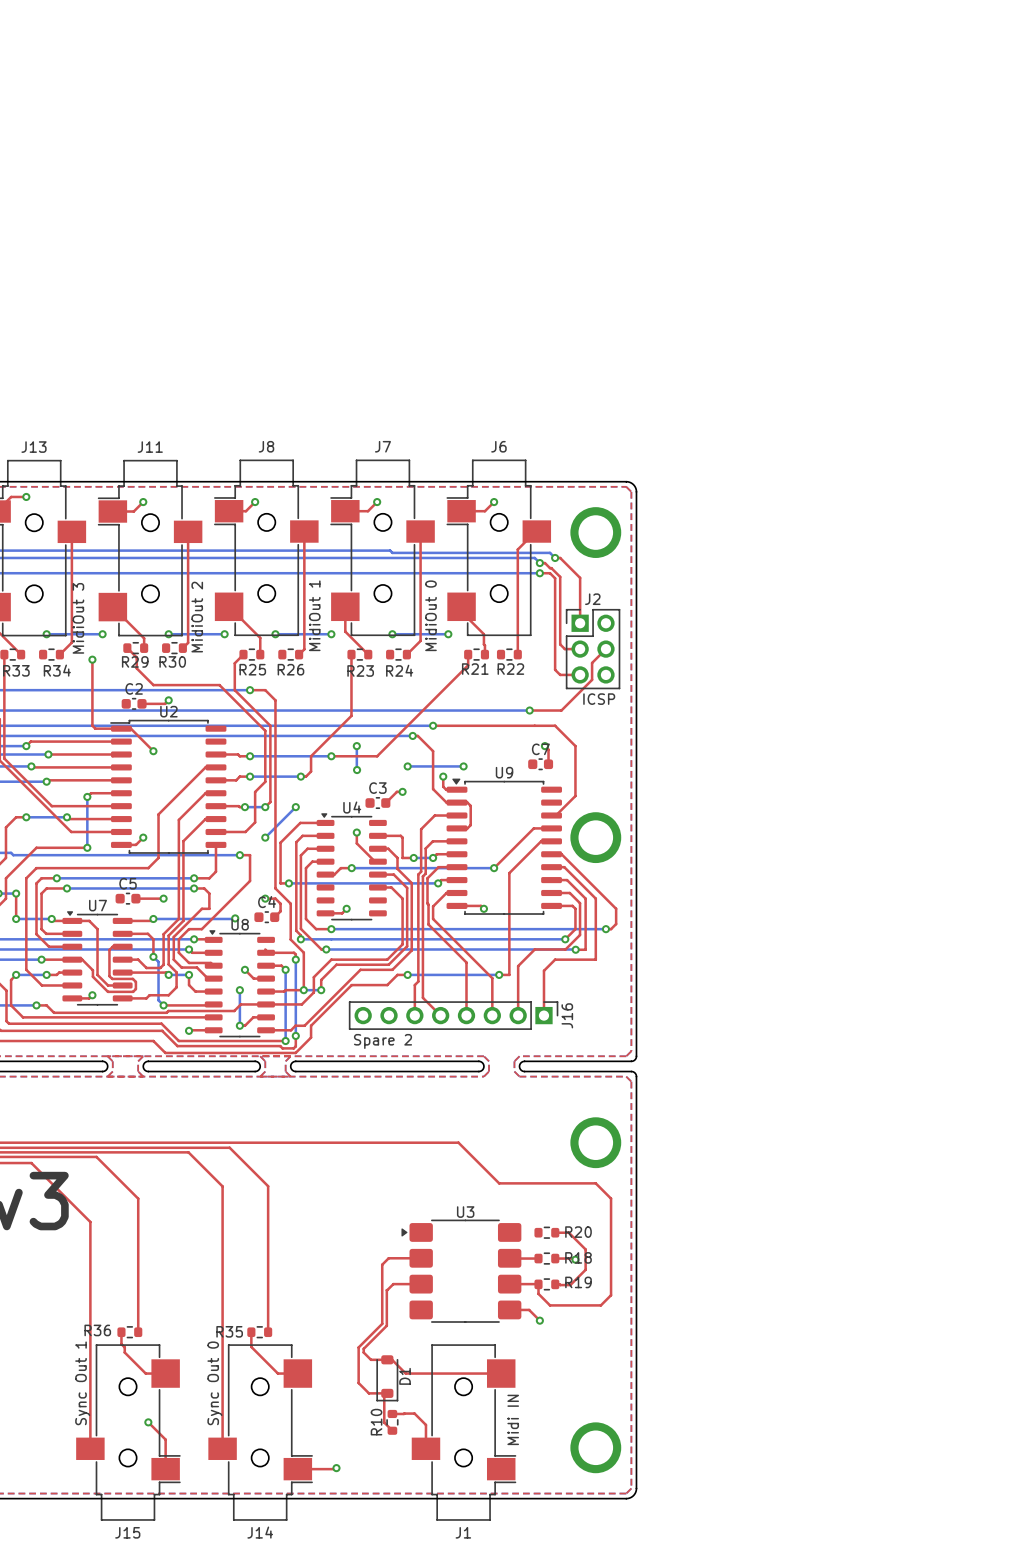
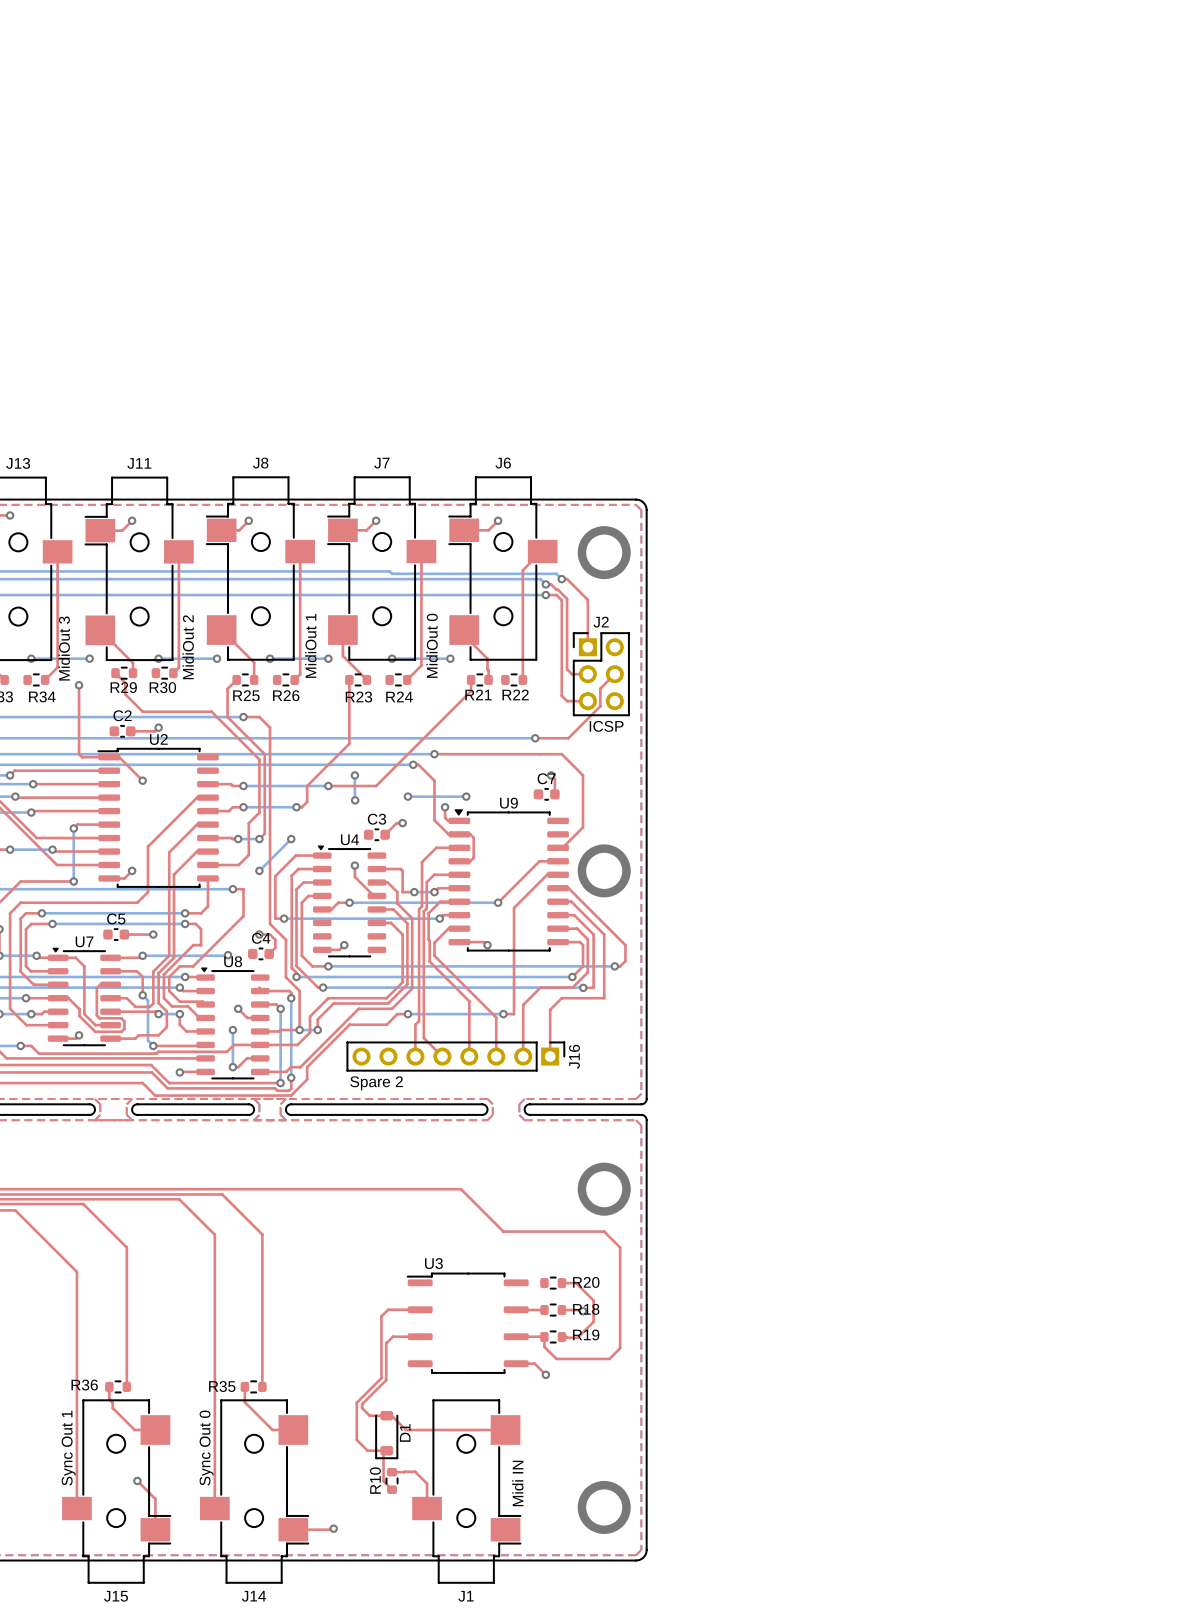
U3 name position: U3 (465, 1212) -> U3 (433, 1263)
U3 footprint: [401, 1219, 522, 1323] -> [407, 1272, 529, 1374]

